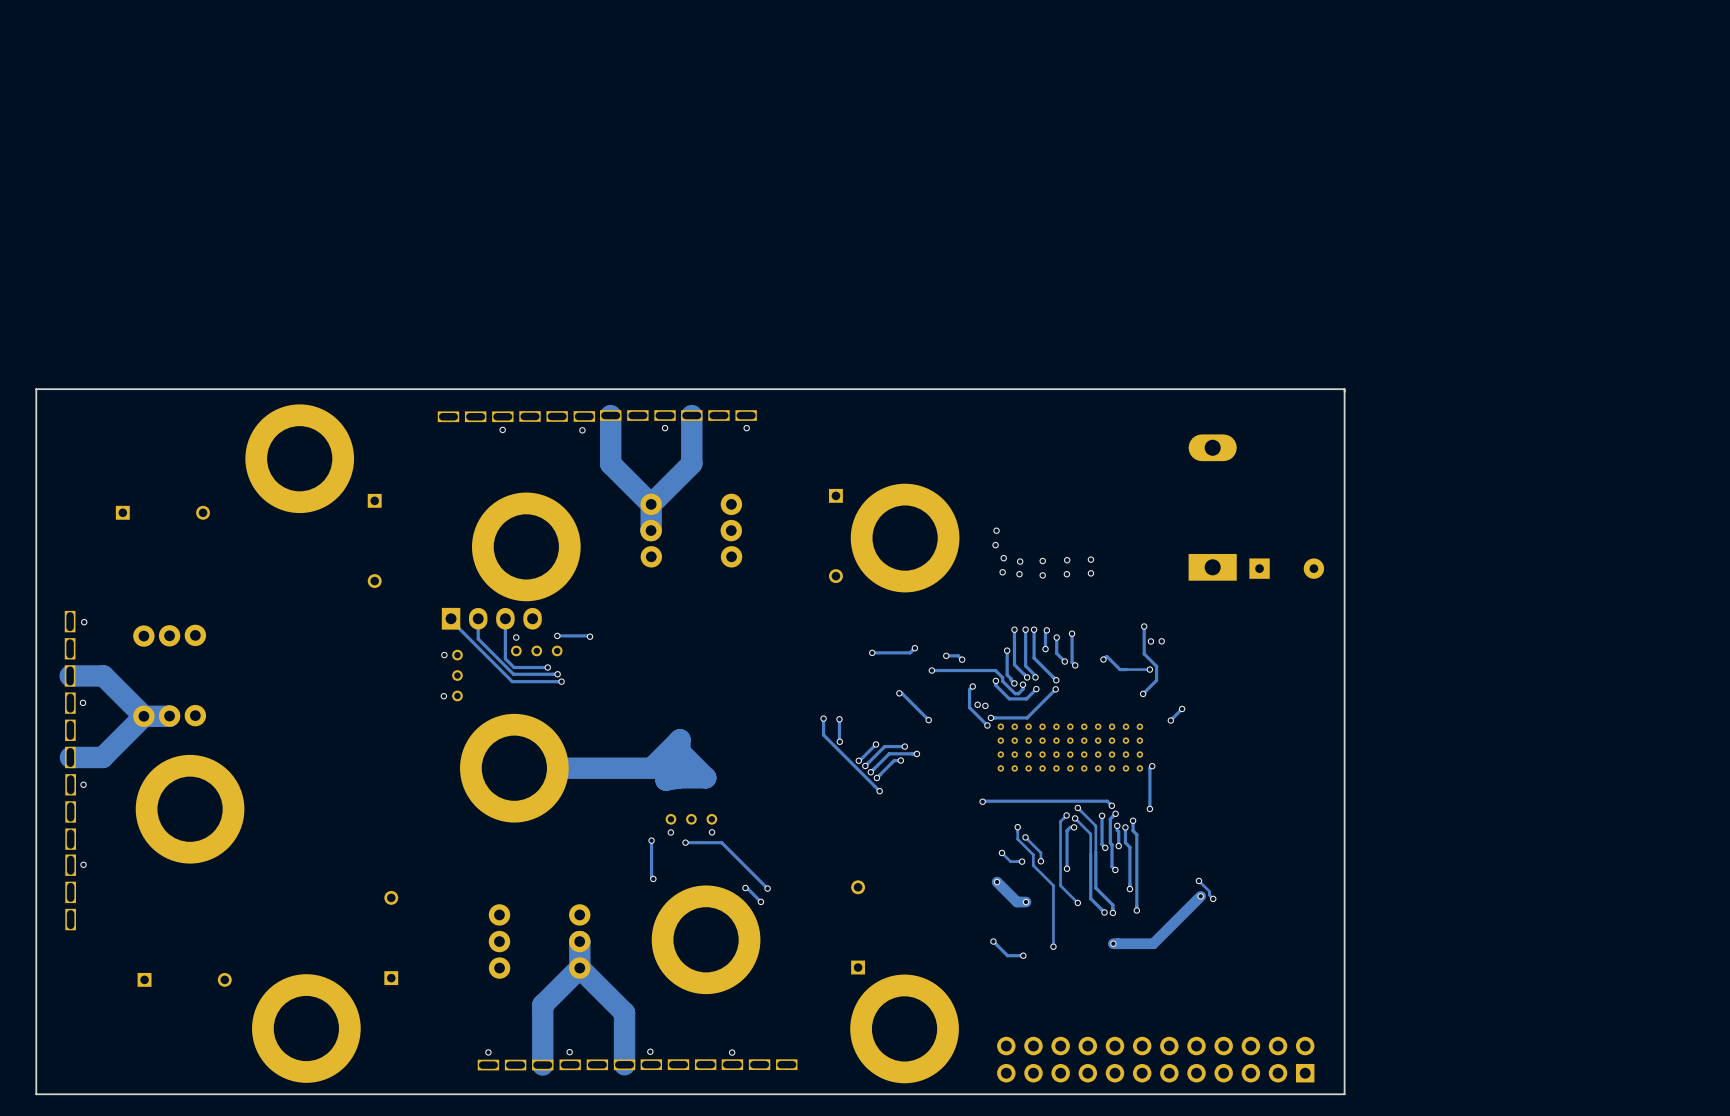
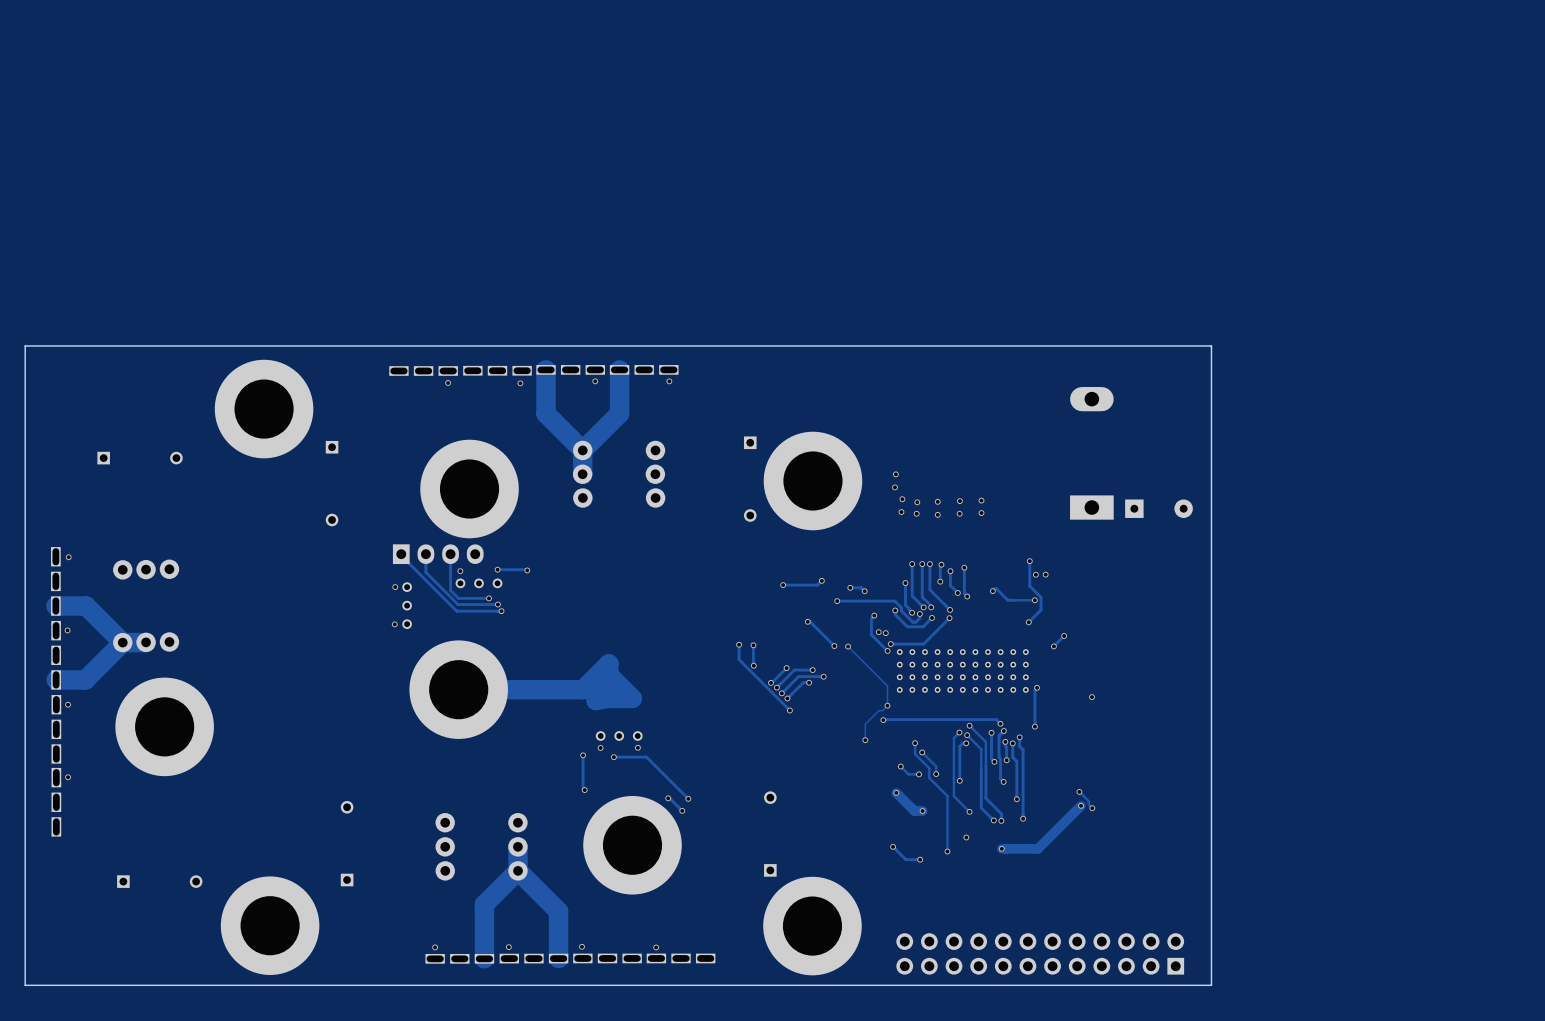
track: none -> (848, 646) (887, 685) (887, 705) (882, 710) (878, 710) (865, 724) (865, 740)
via: none -> (848, 646)
via: none -> (1091, 697)
via: none -> (887, 705)
via: none -> (865, 740)
via: none -> (966, 837)

